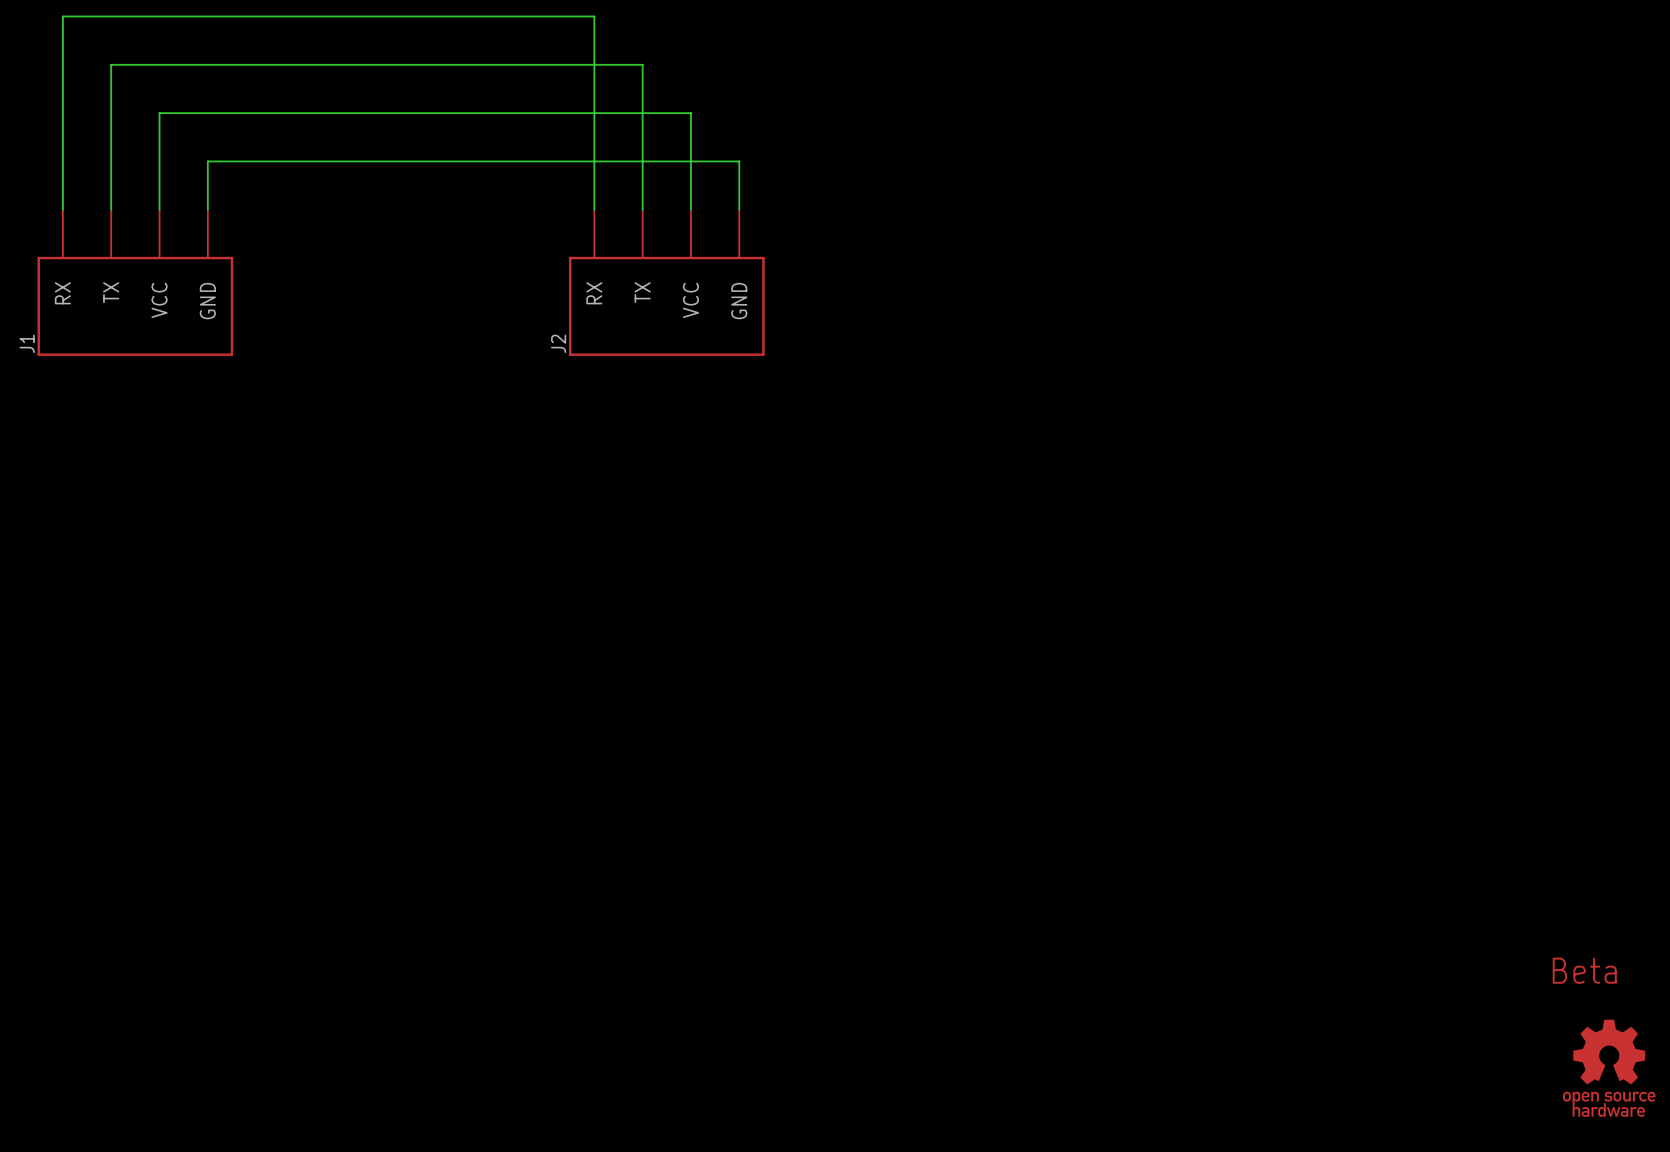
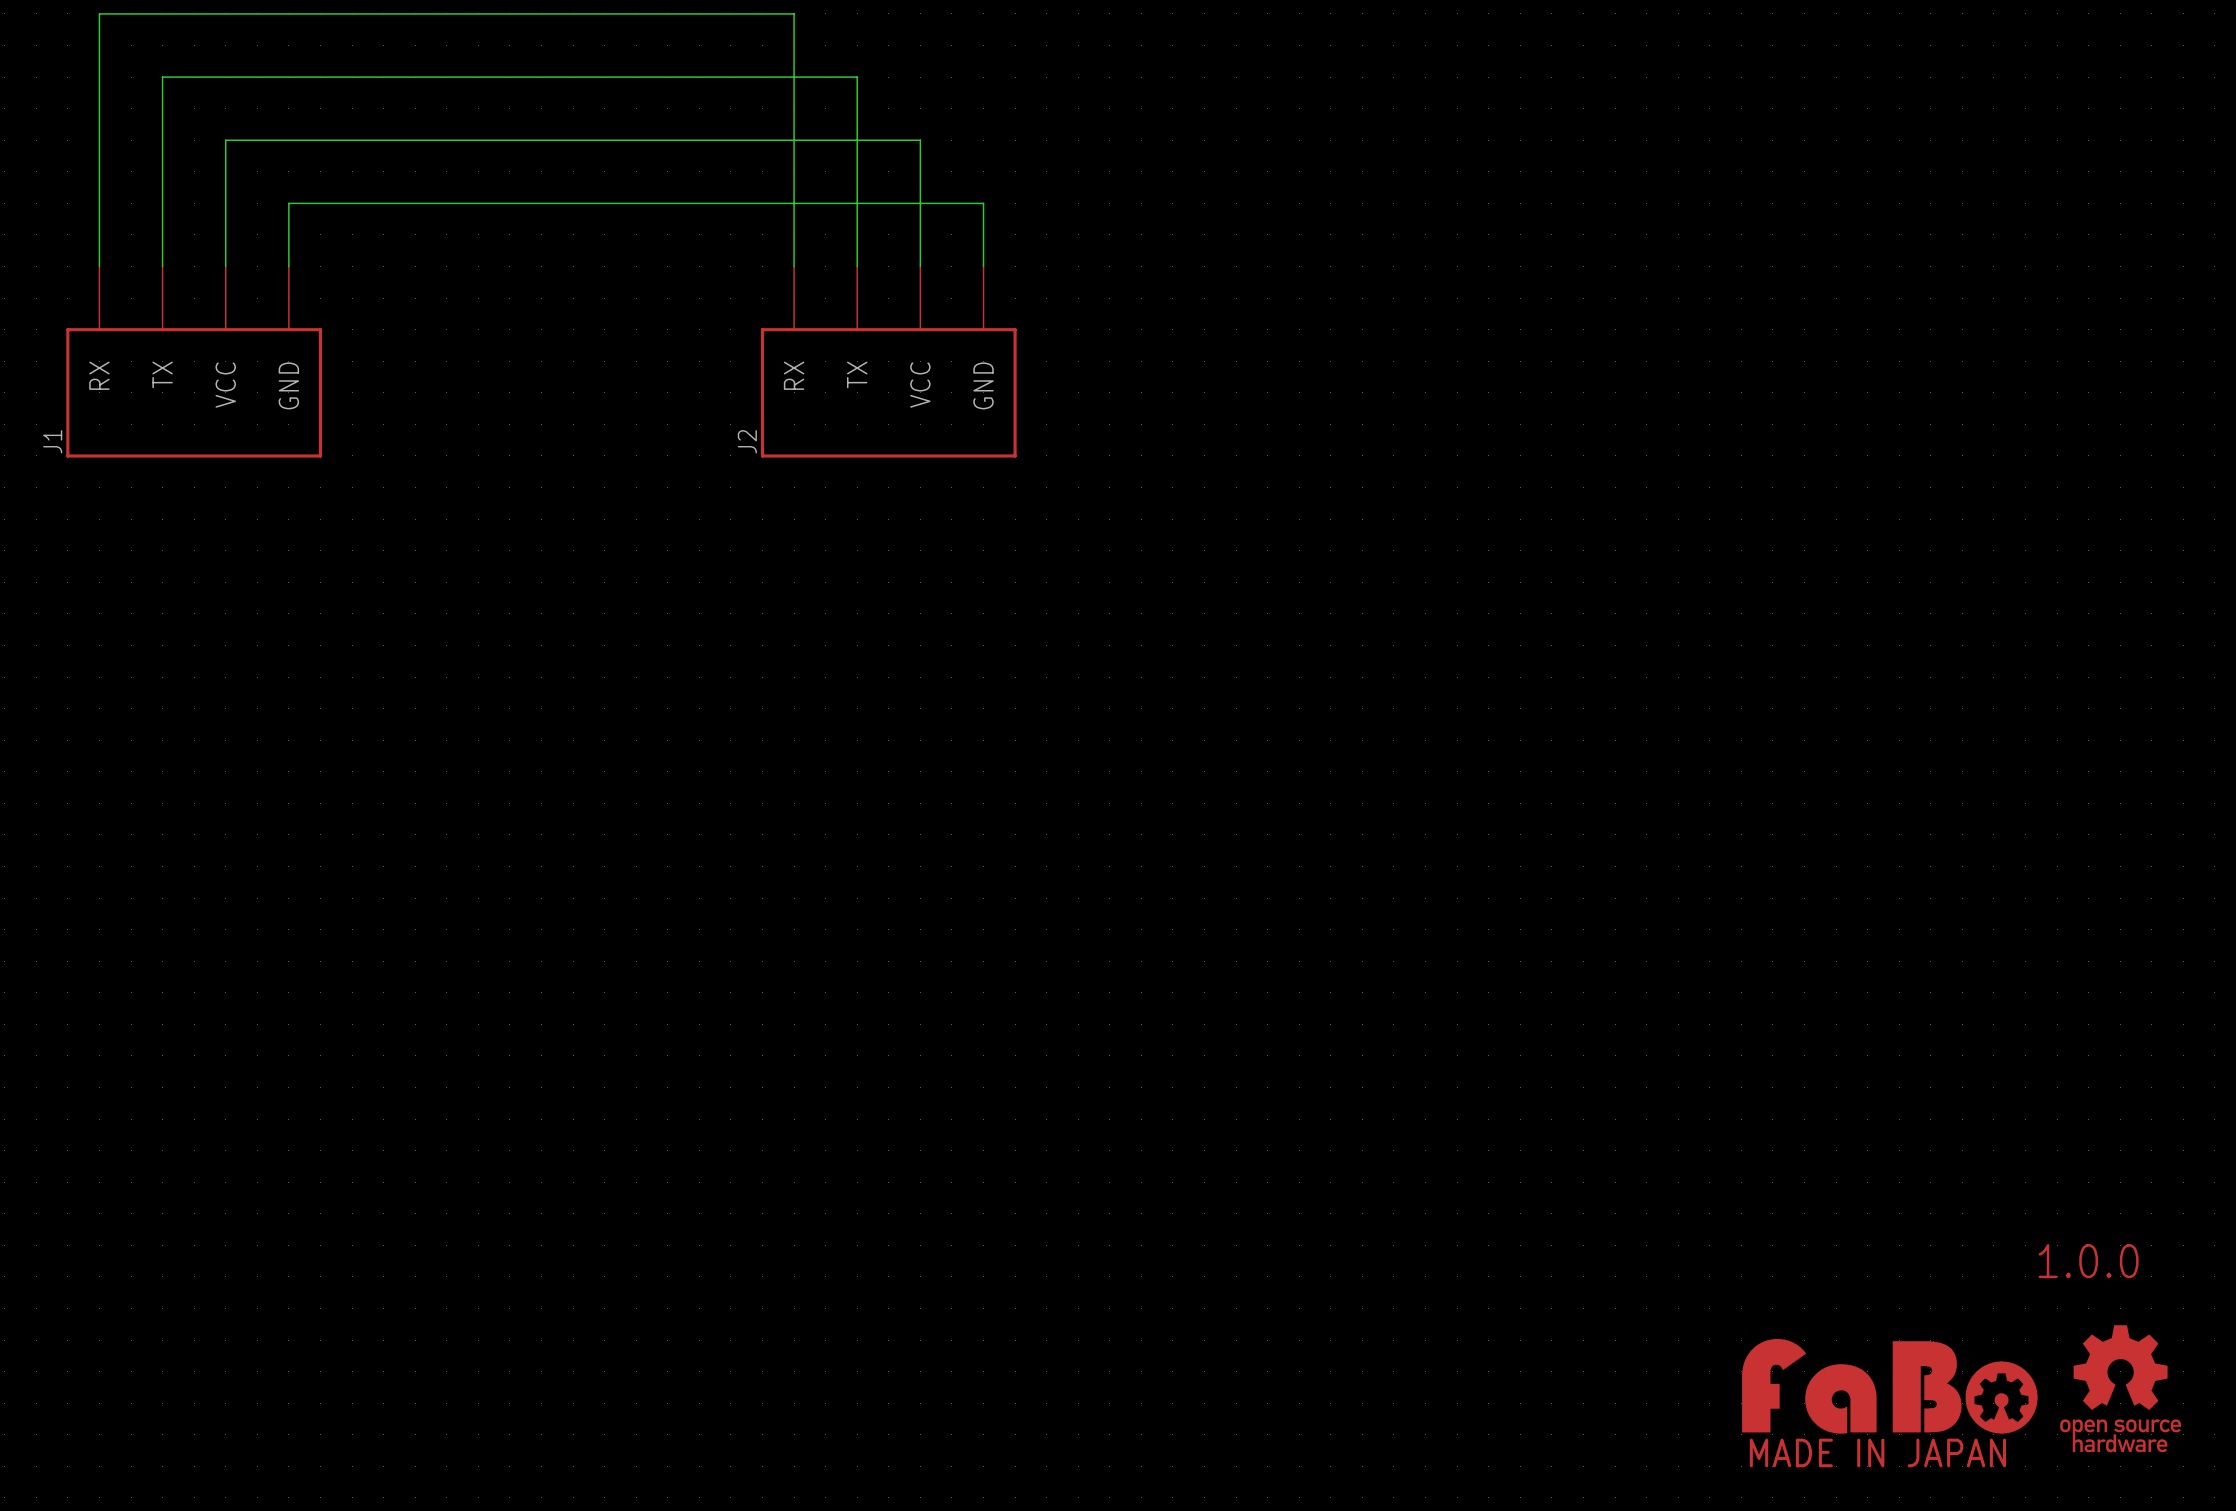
text: Beta (1584, 970) -> 1.0.0 (2088, 1261)
part: none -> (1889, 1386)

